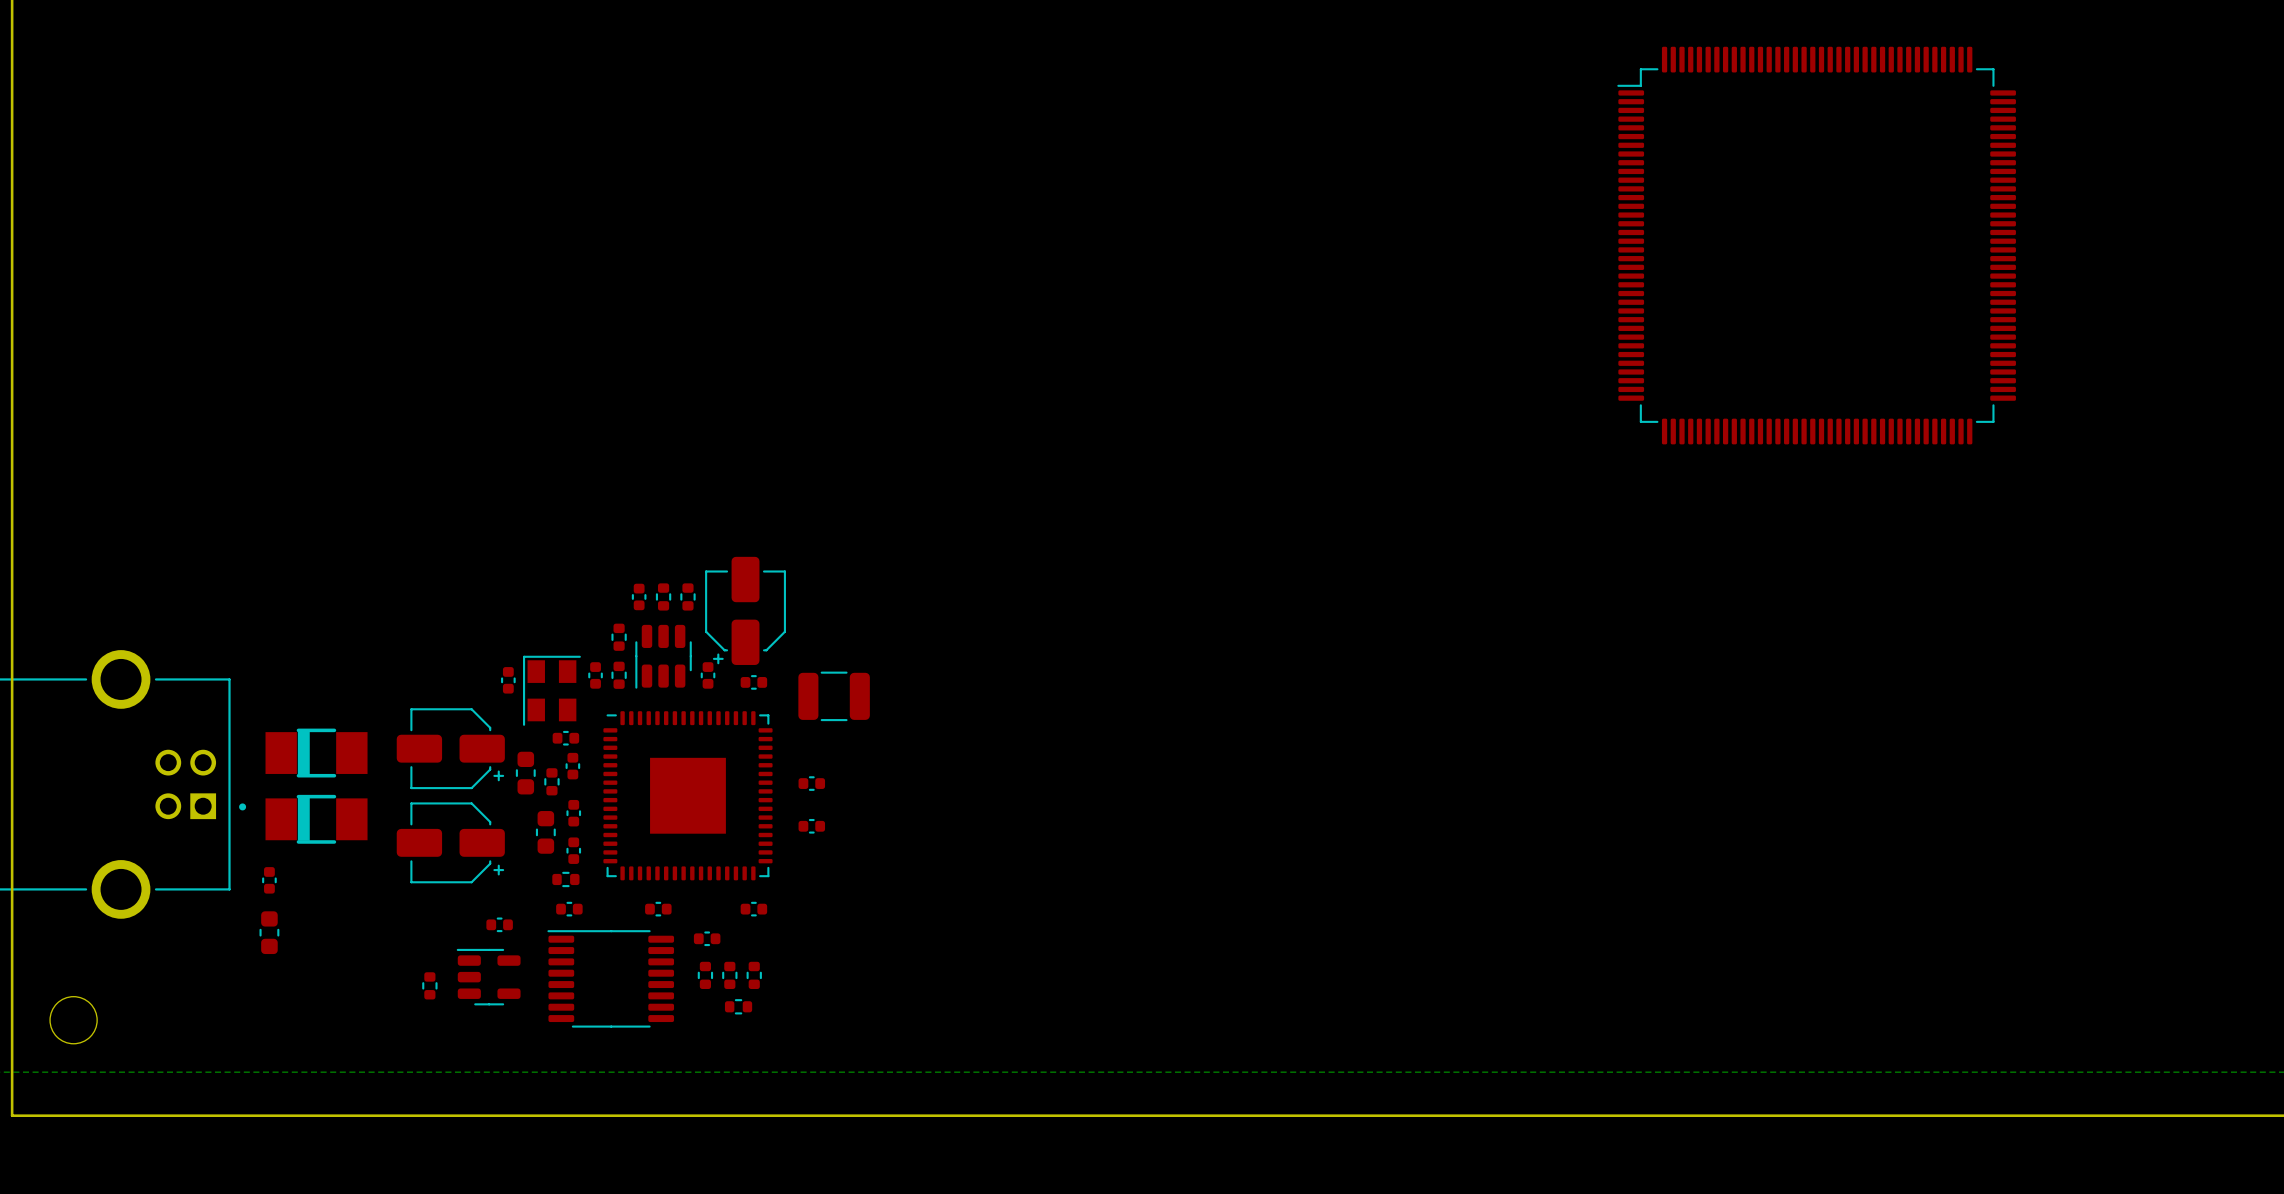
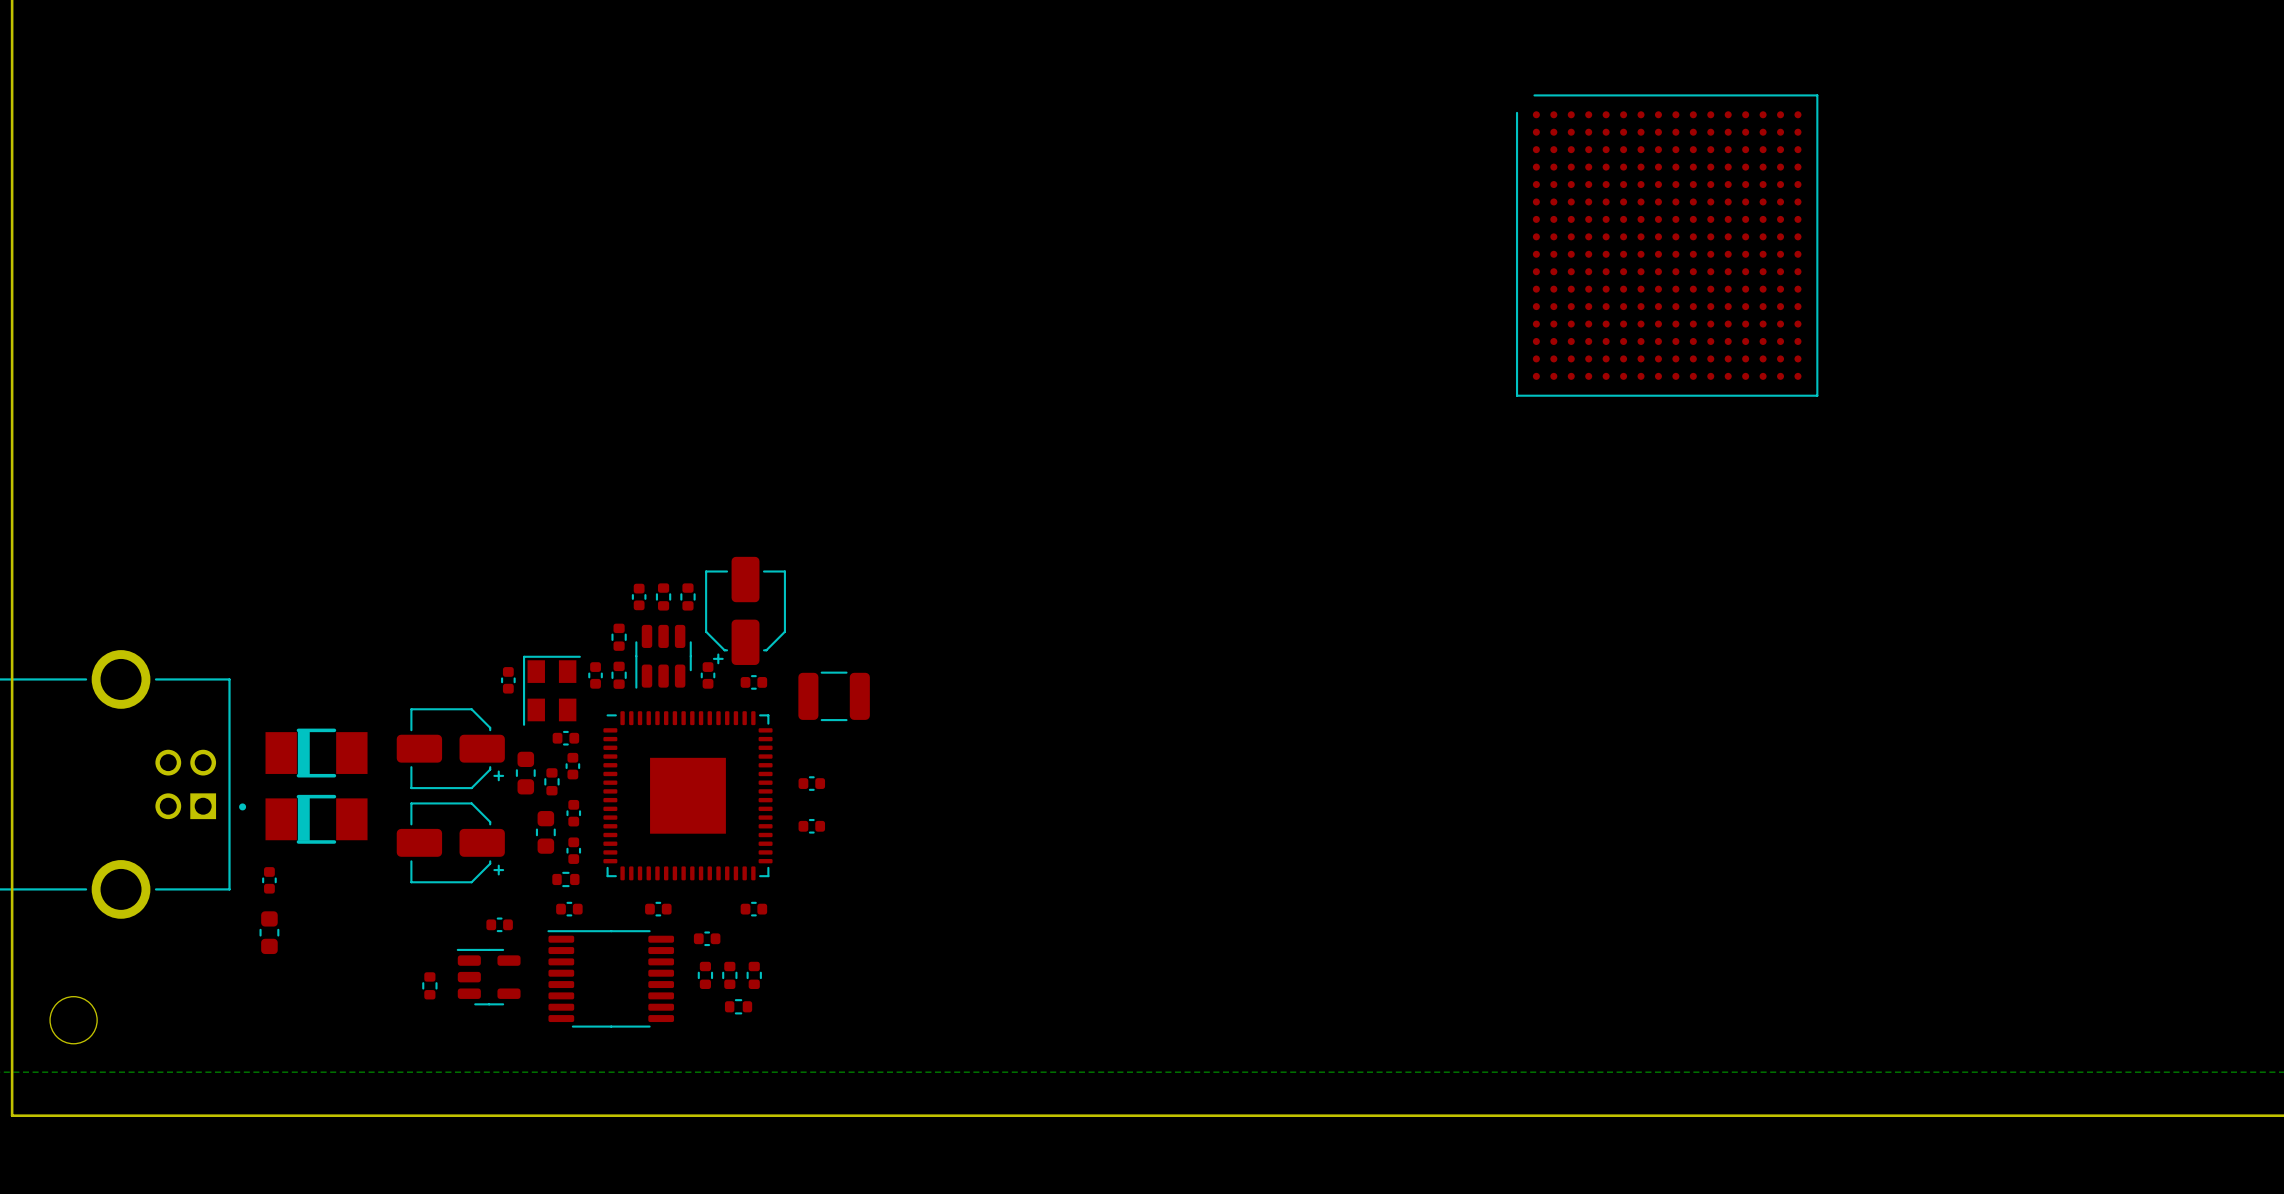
part: none -> (1667, 245)
part: (1816, 245) -> none

